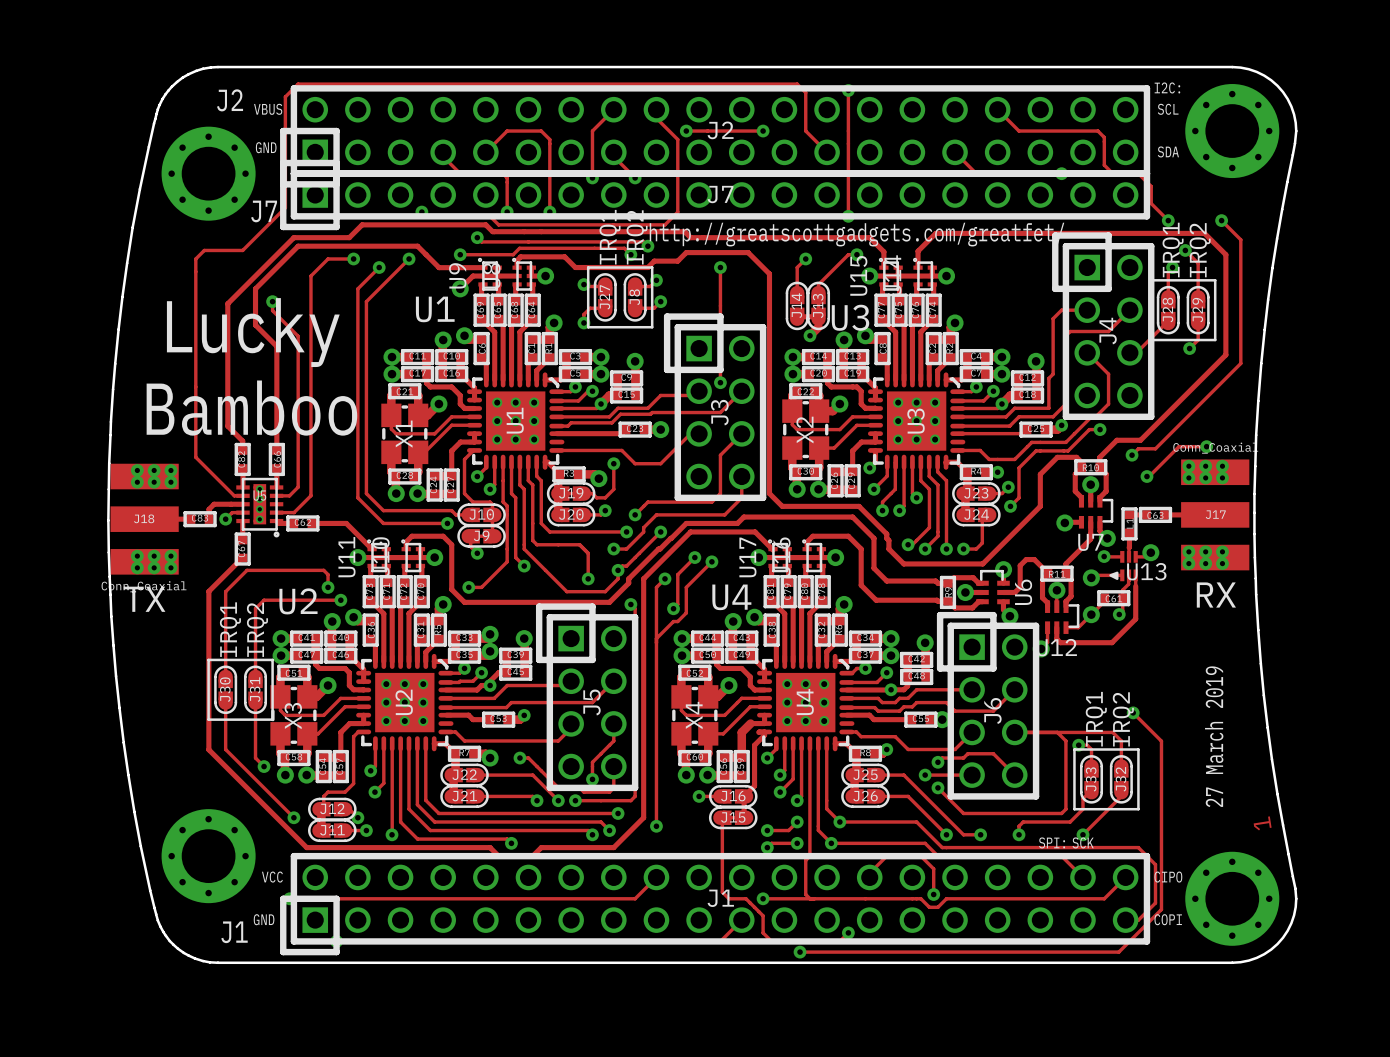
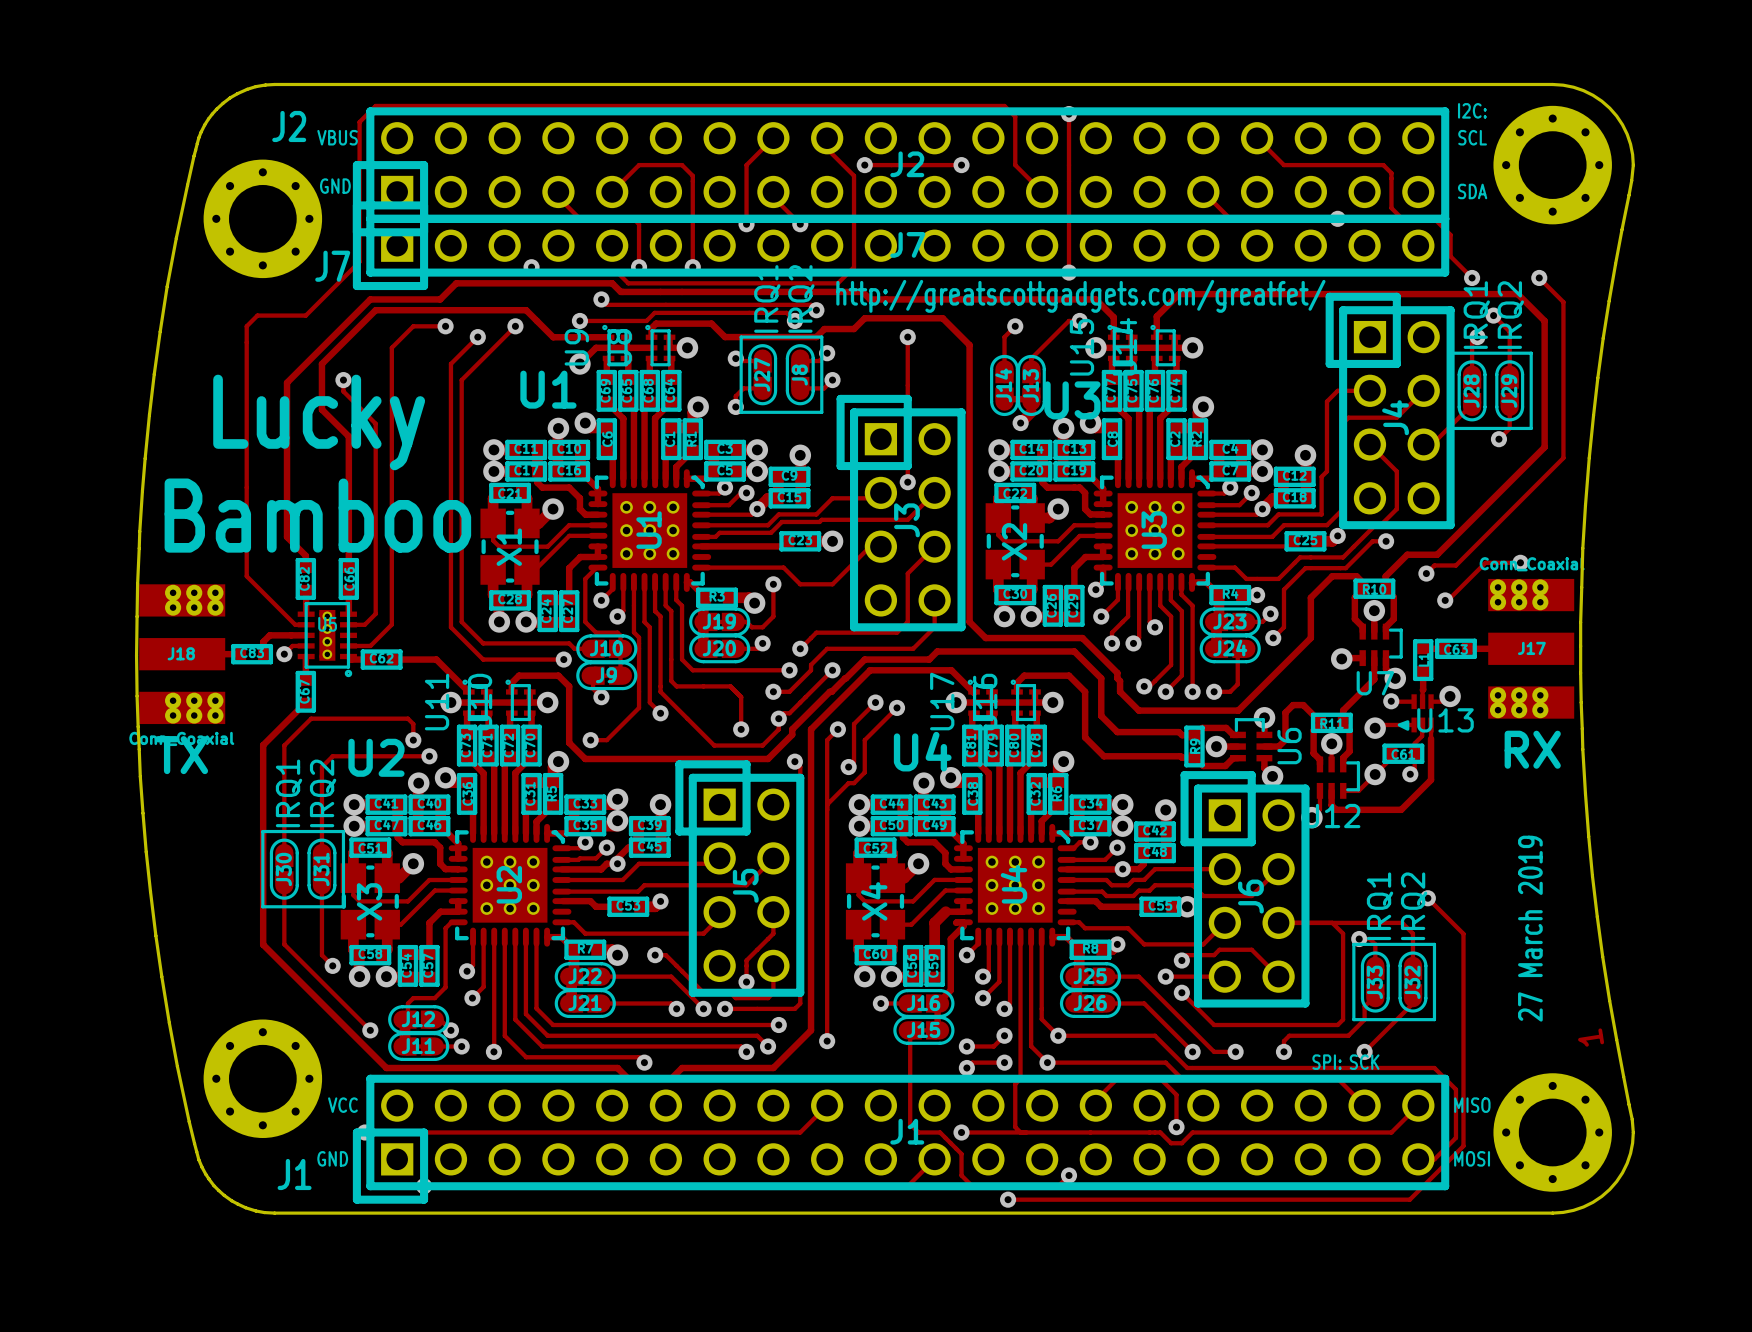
text: CIPO (1168, 877) -> MISO (1472, 1105)
text: COPI (1168, 919) -> MOSI (1472, 1158)

